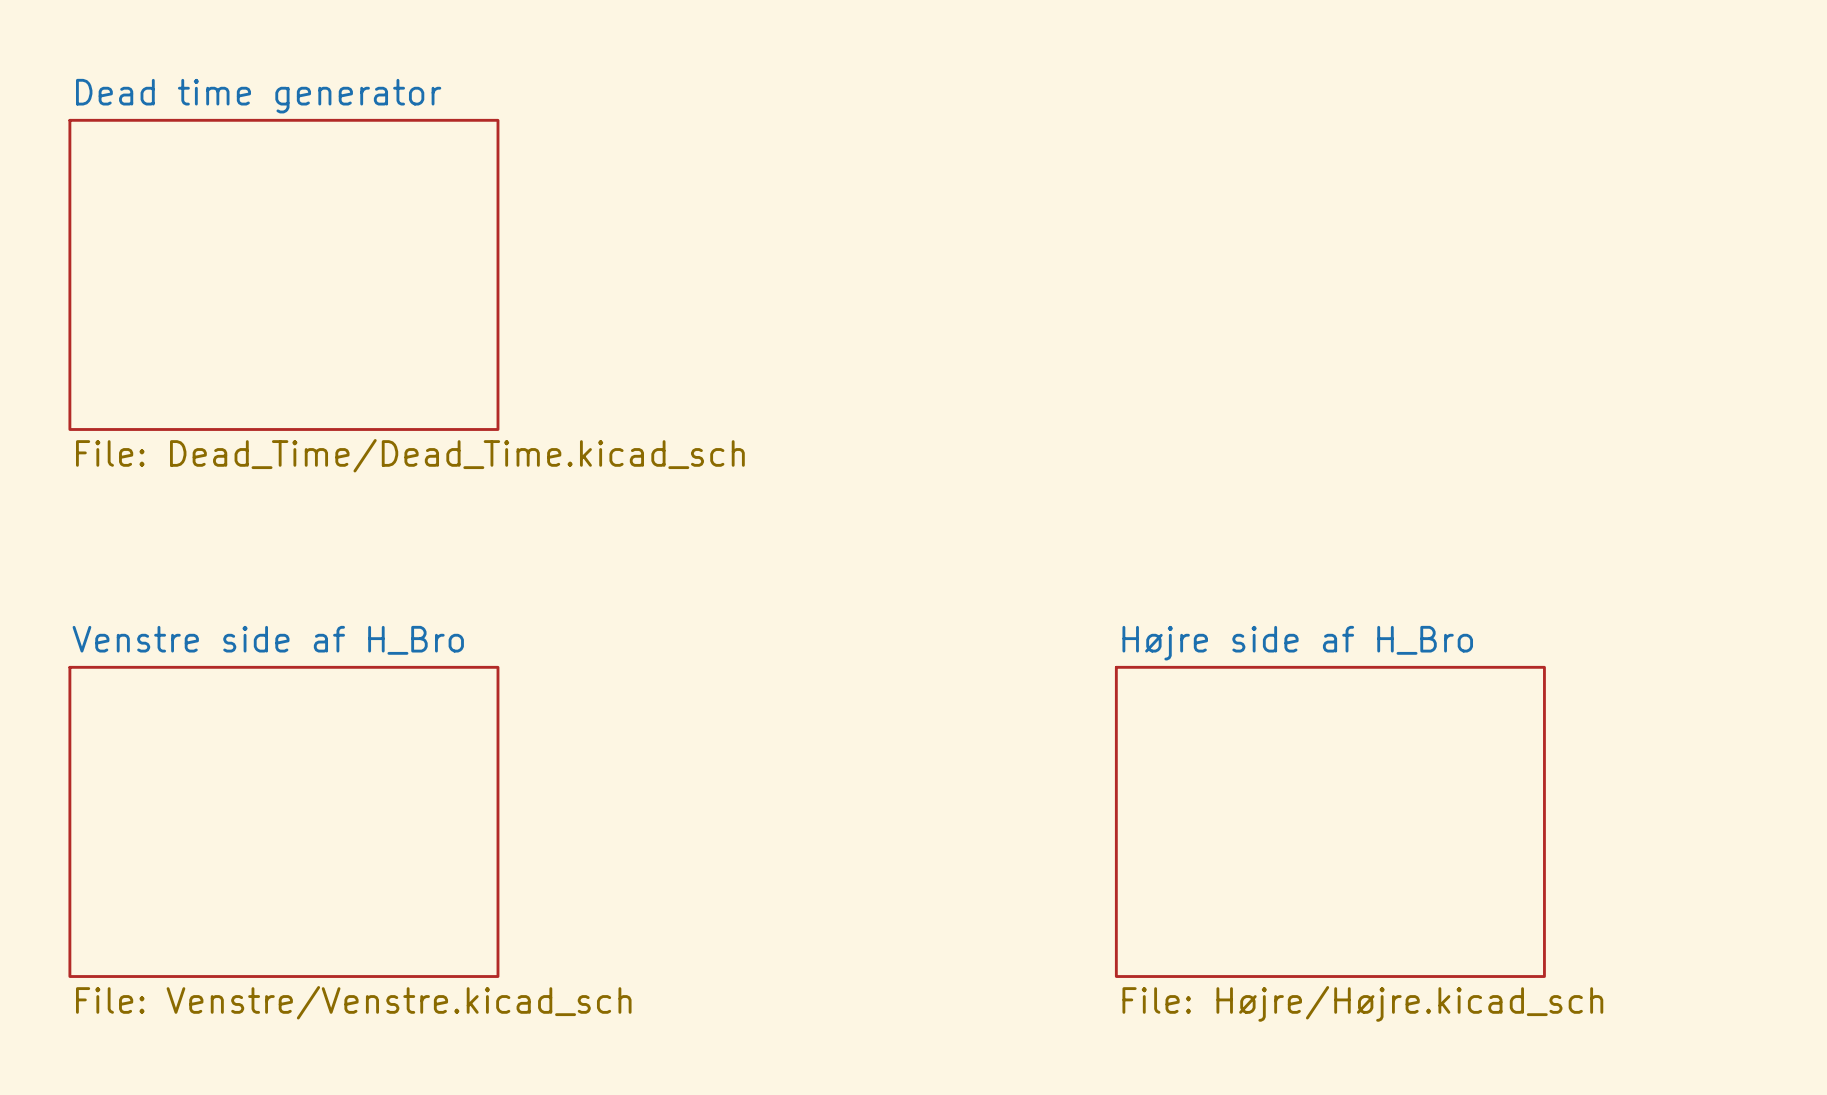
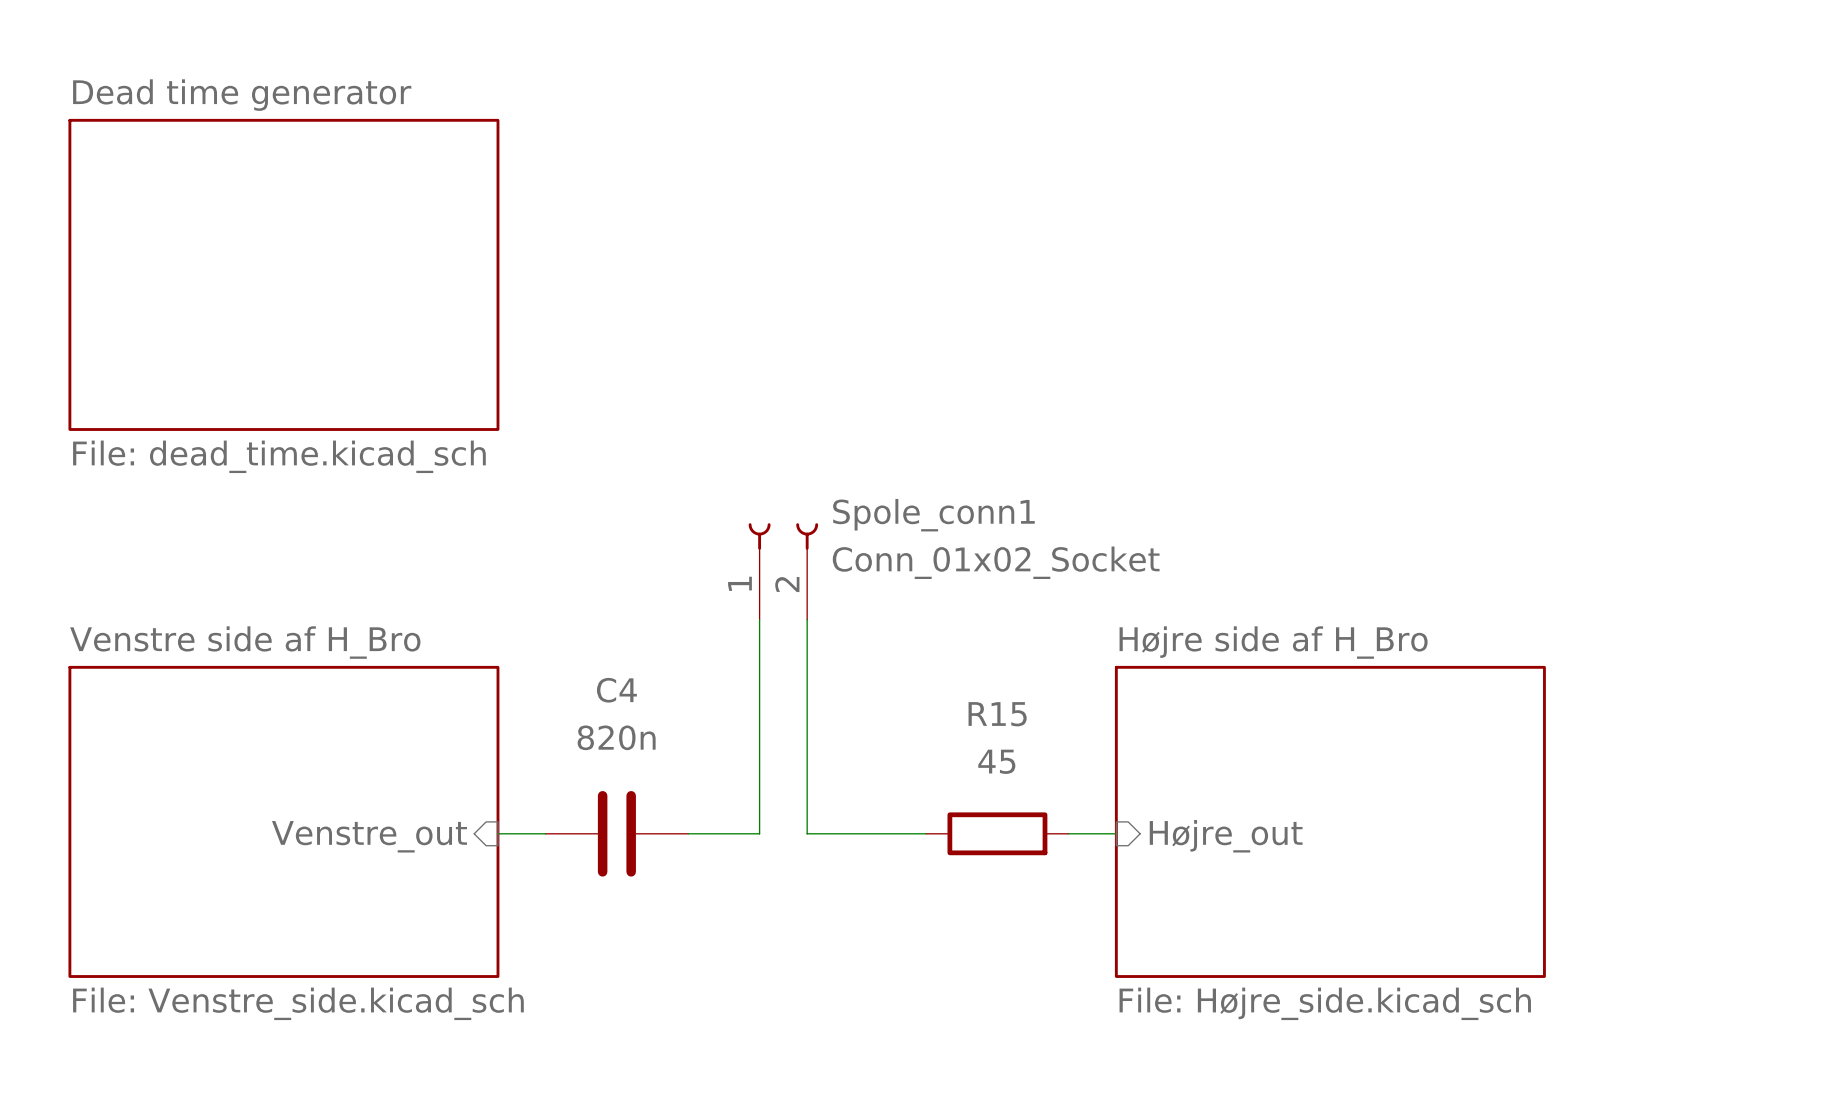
sheet Dead time generator value: File: Dead_Time/Dead_Time.kicad_sch (410, 455) -> File: dead_time.kicad_sch (279, 456)
Spole_conn1: none -> Conn_01x02_Socket (783, 571)
wire: none -> (759, 619) (759, 833) (688, 833)
wire: none -> (807, 619) (807, 833) (926, 833)
wire: none -> (497, 833) (545, 833)
C4: none -> 820n (616, 833)
R15: none -> 45 (997, 833)
wire: none -> (1068, 833) (1116, 833)
sheet pin: none -> Venstre_out (369, 836)
sheet pin: none -> Højre_out (1226, 836)
sheet Venstre side af H_Bro value: File: Venstre/Venstre.kicad_sch (353, 1002) -> File: Venstre_side.kicad_sch (298, 1003)
sheet Højre side af H_Bro value: File: Højre/Højre.kicad_sch (1362, 1003) -> File: Højre_side.kicad_sch (1325, 1003)

